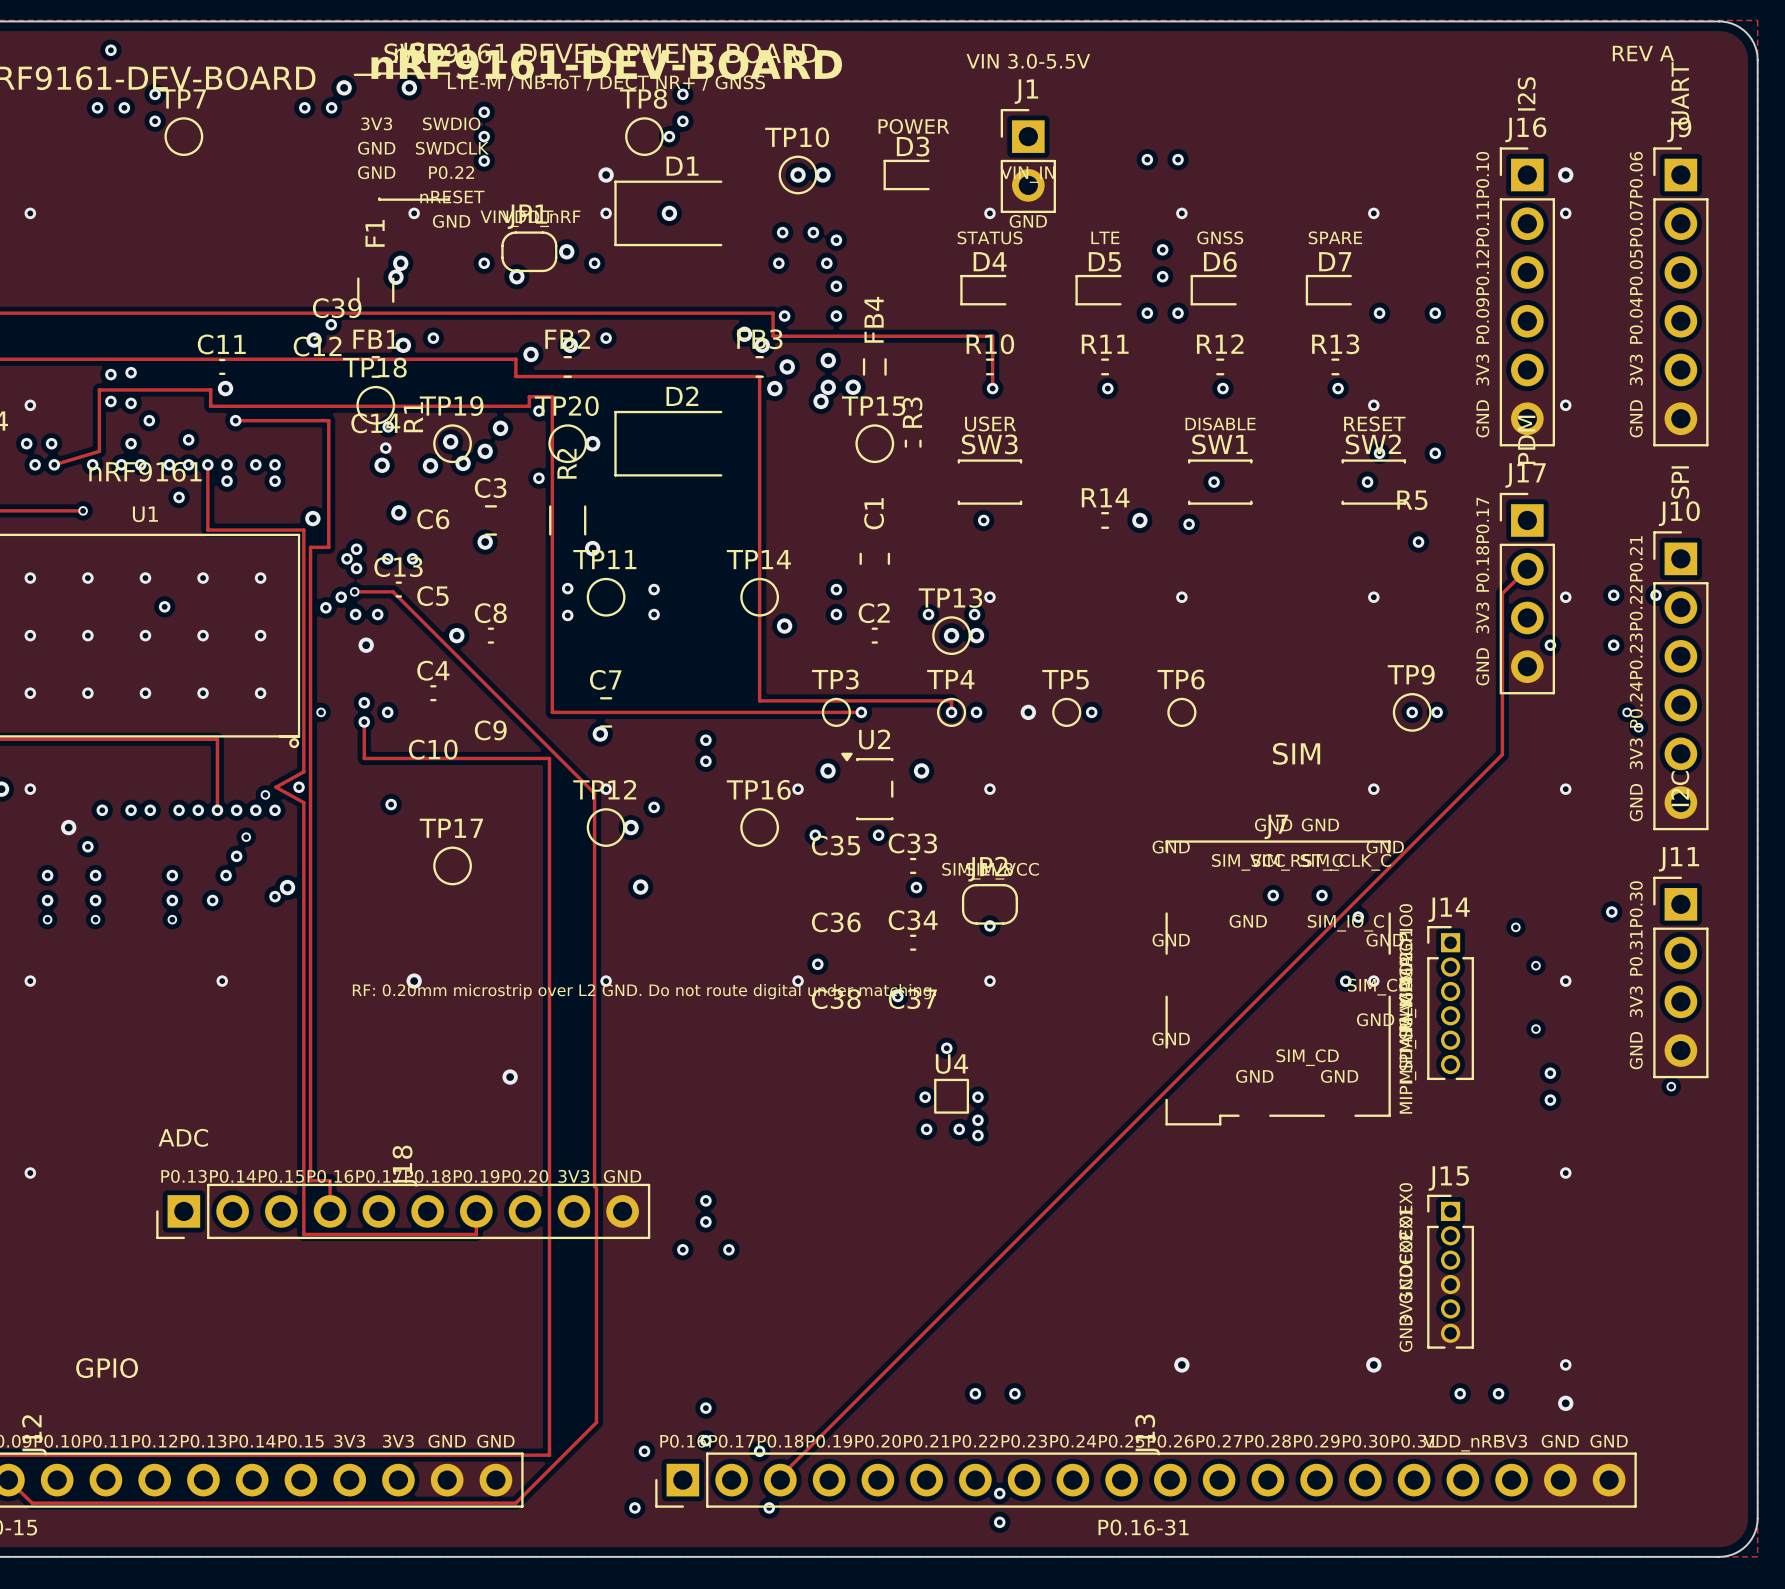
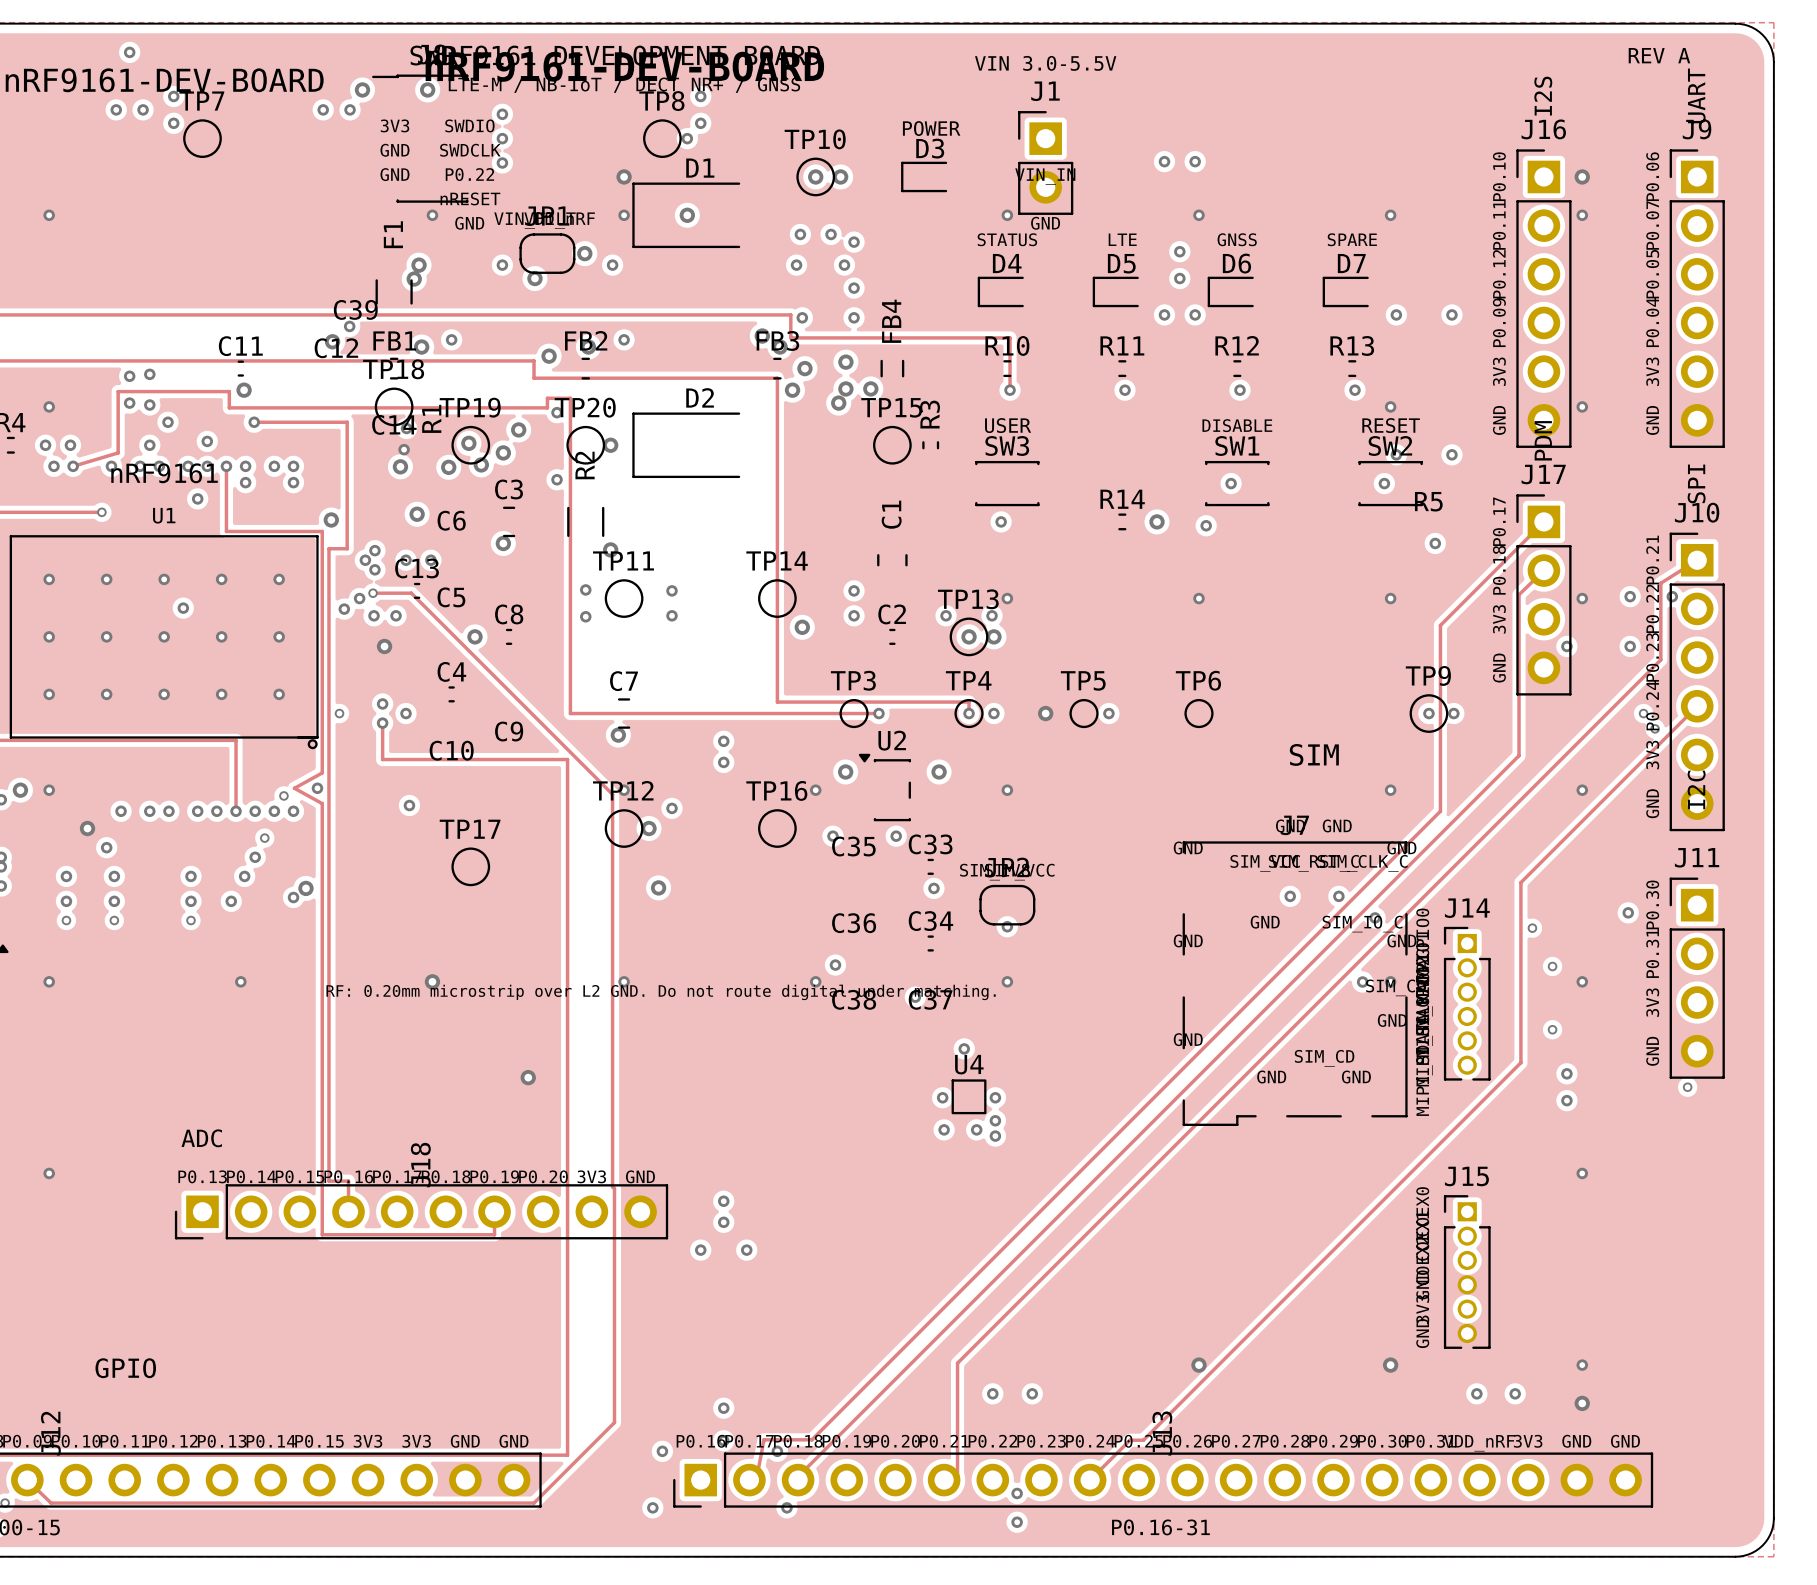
track: none -> (1543, 521) (1440, 625) (1440, 811) (811, 1439) (763, 1439) (756, 1480)
track: none -> (1697, 560) (1660, 583) (1660, 659) (957, 1363) (957, 1480)
track: none -> (1697, 706) (1520, 882) (1520, 1062) (1143, 1440) (1130, 1440) (1090, 1480)

